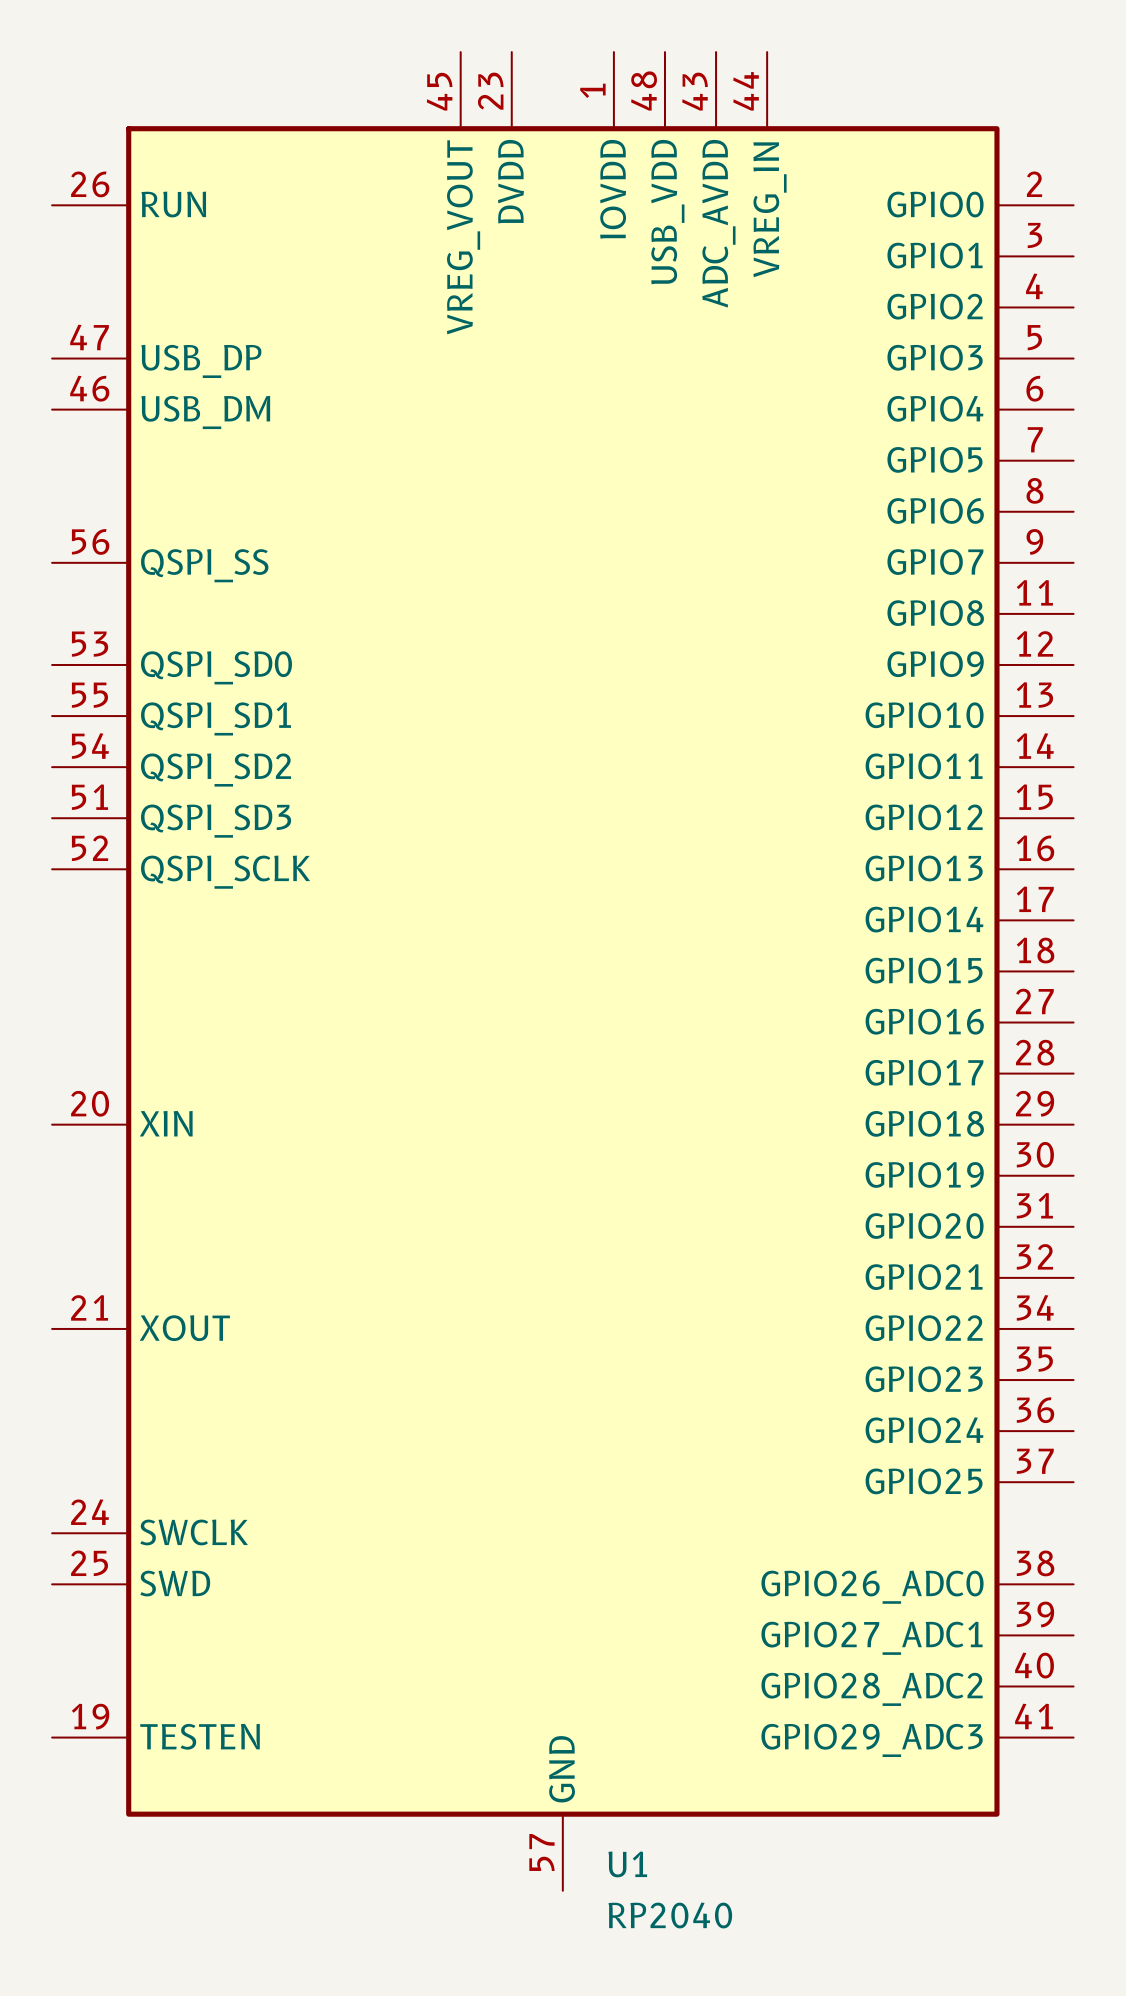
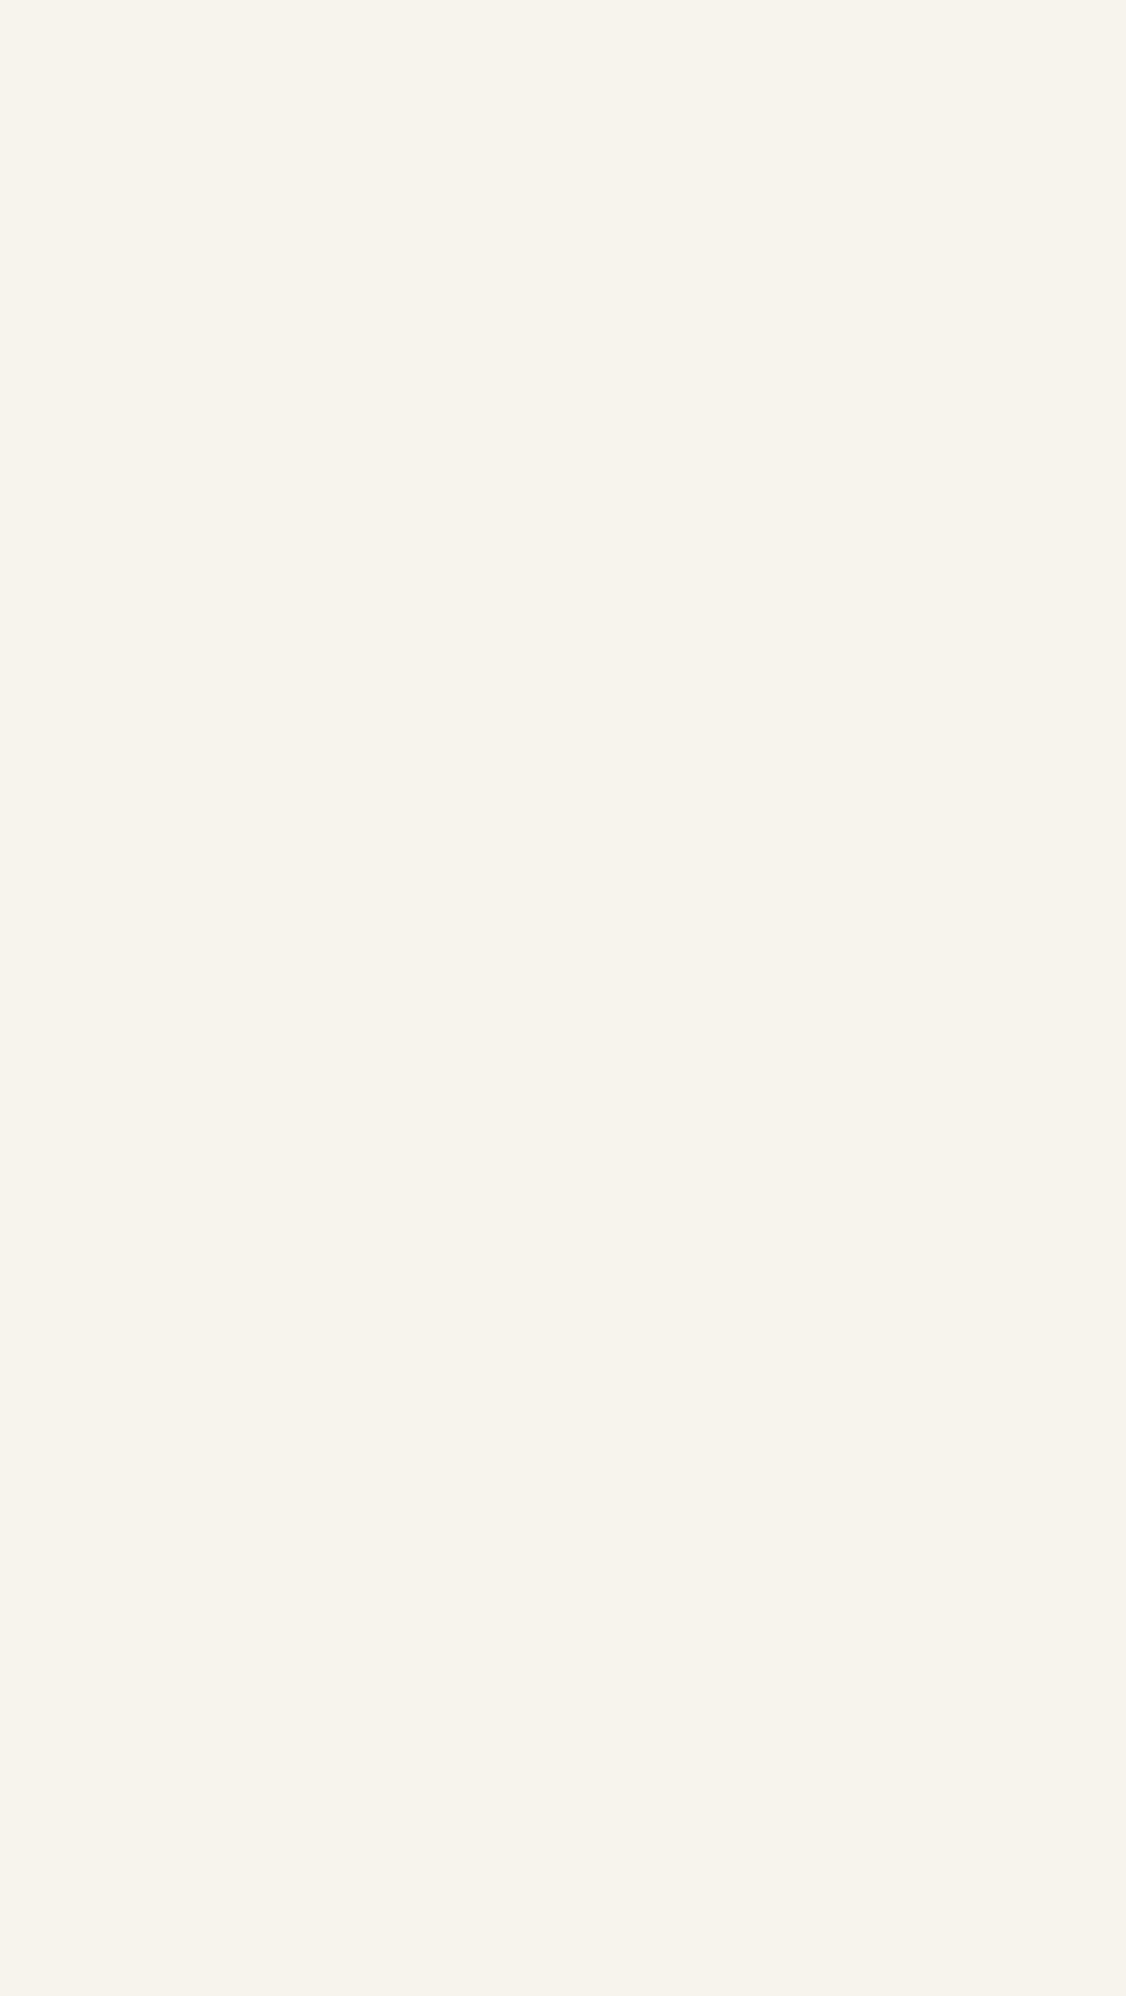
U1: RP2040 (562, 971) -> none

